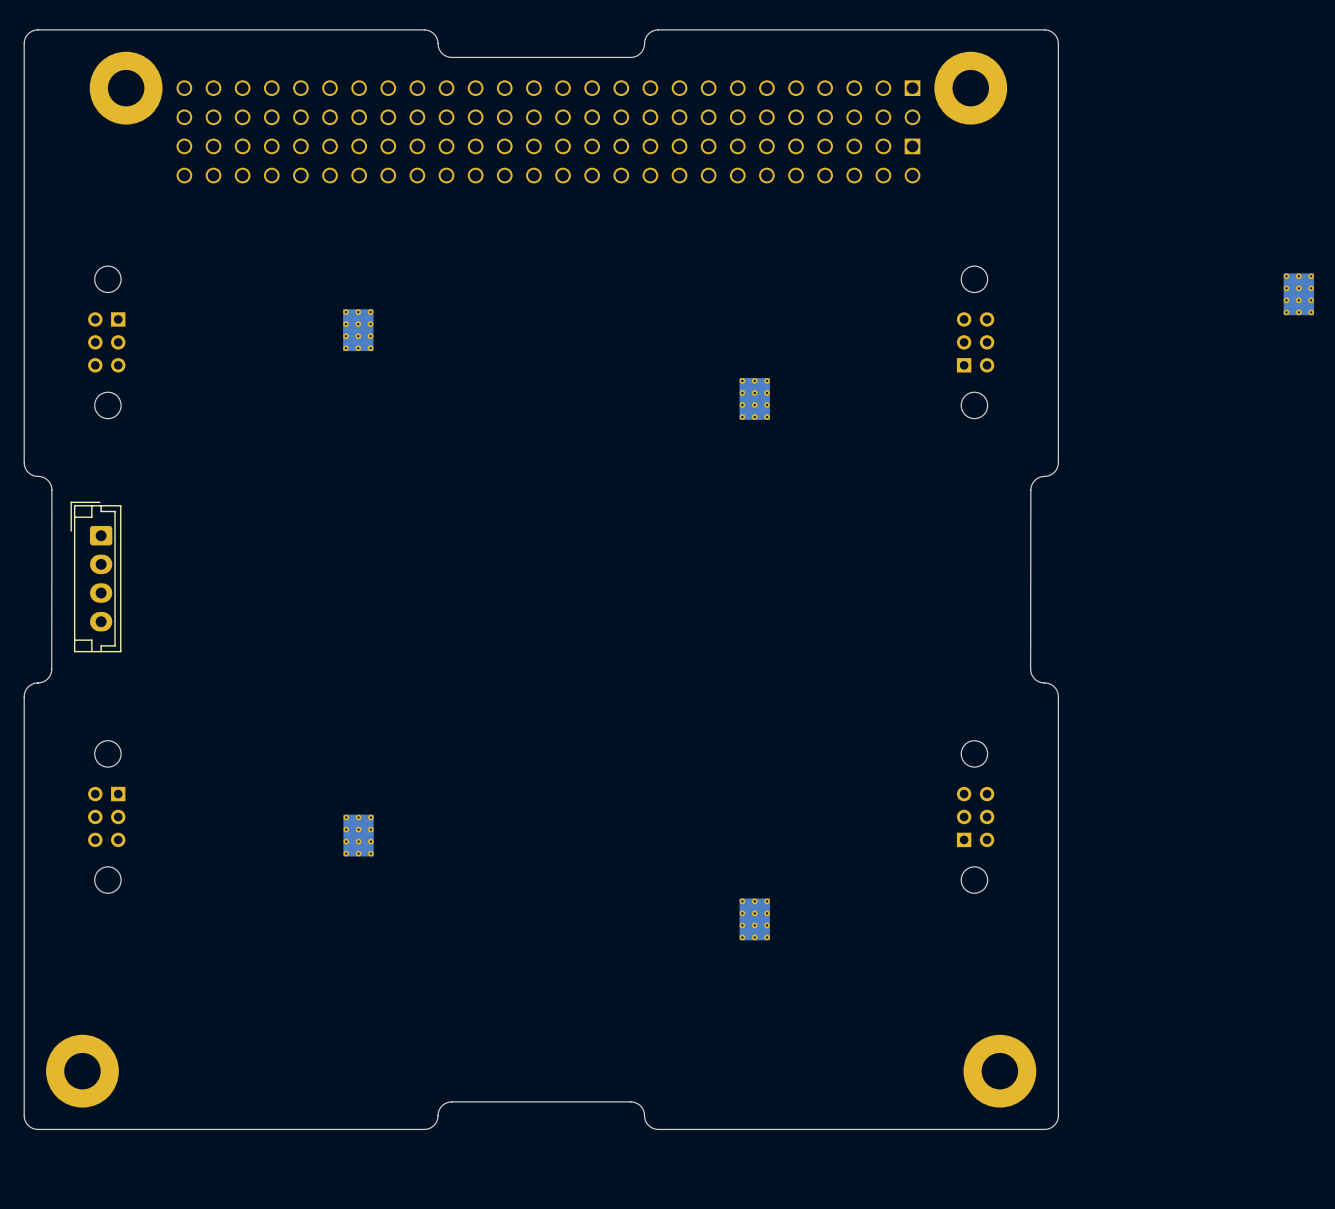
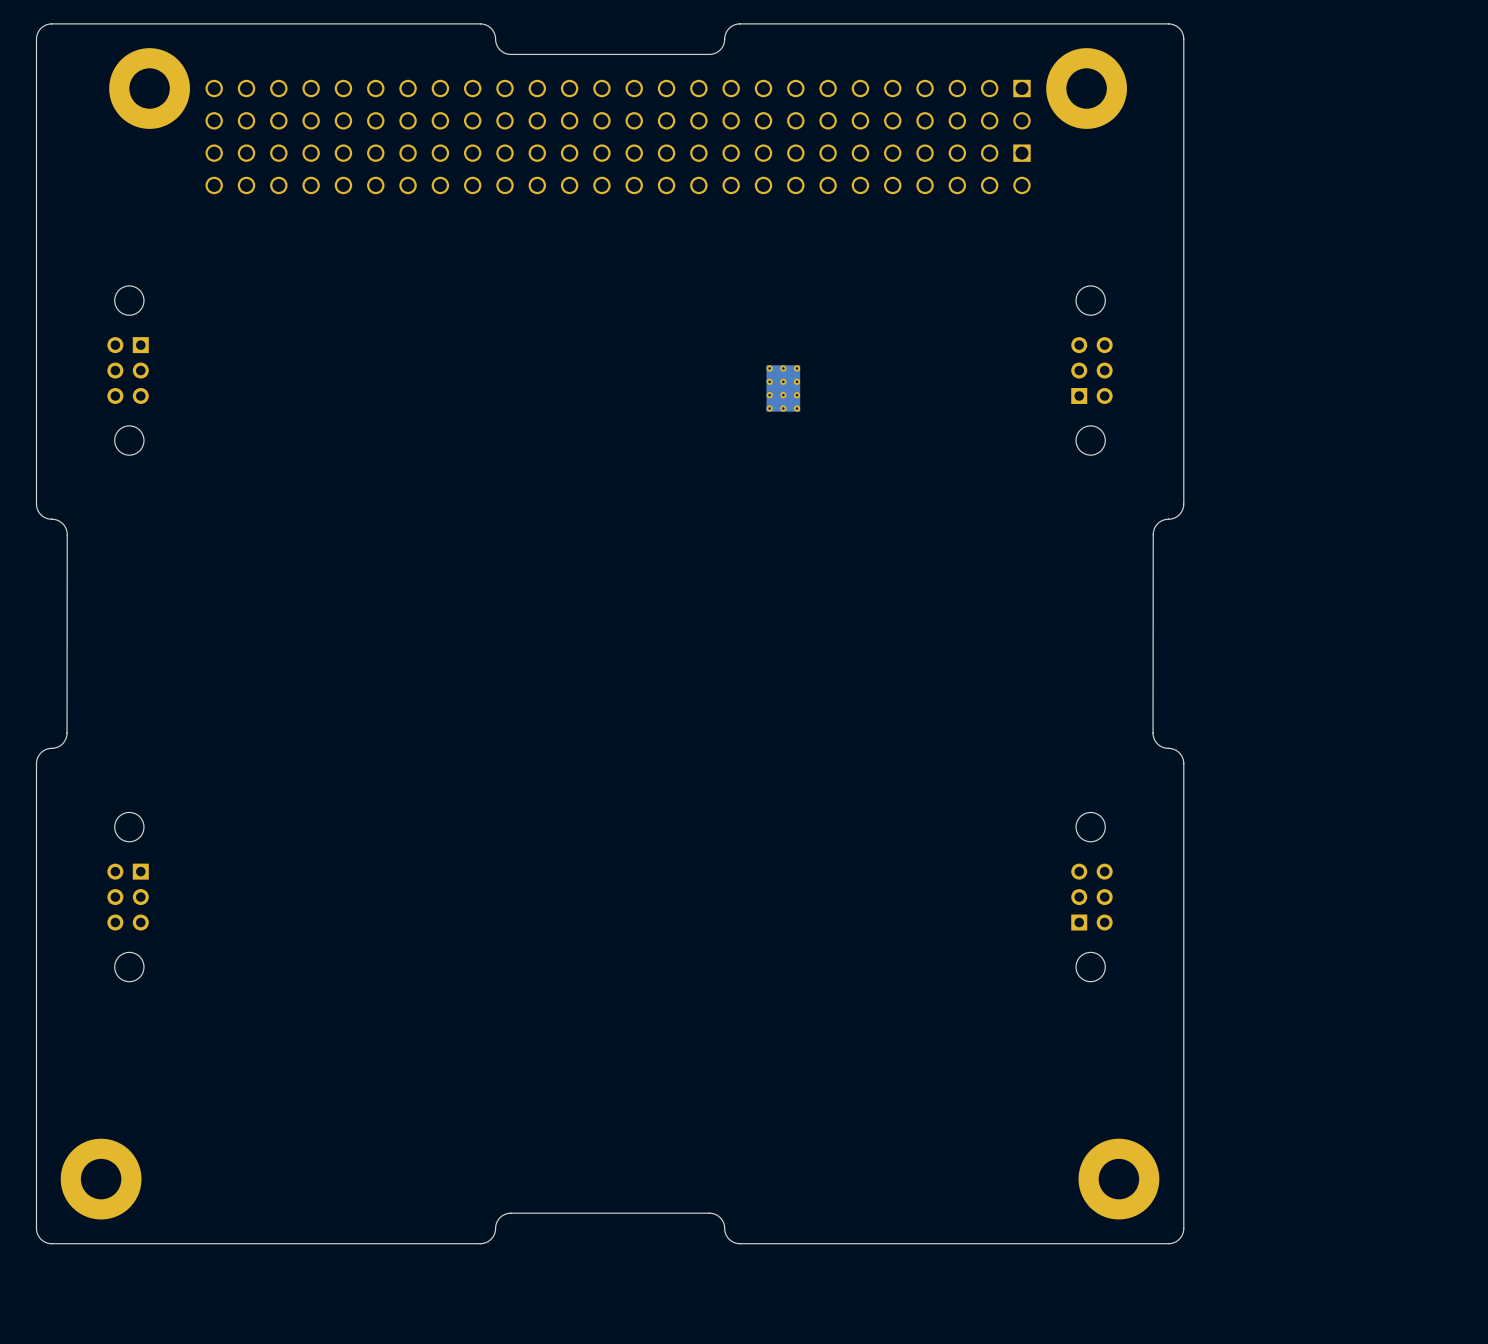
part: (1298, 294) -> none
part: (358, 330) -> none
part position: (754, 398) -> (783, 388)
part: (95, 576) -> none
part: (358, 835) -> none
part: (754, 919) -> none

